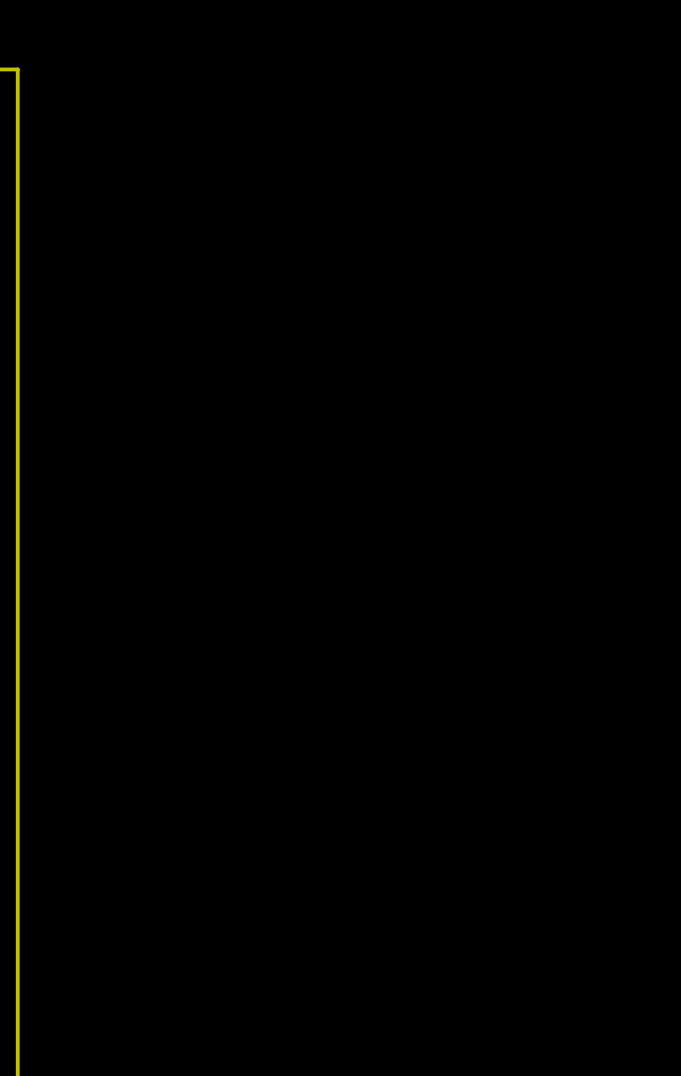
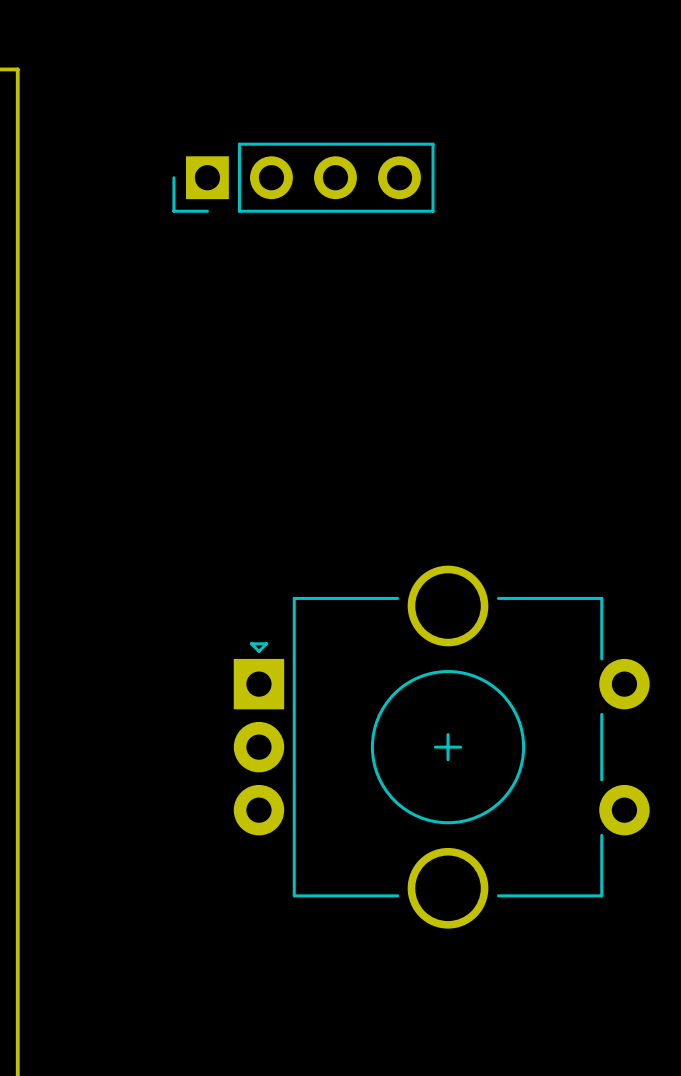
part: none -> (303, 177)
part: none -> (441, 747)

